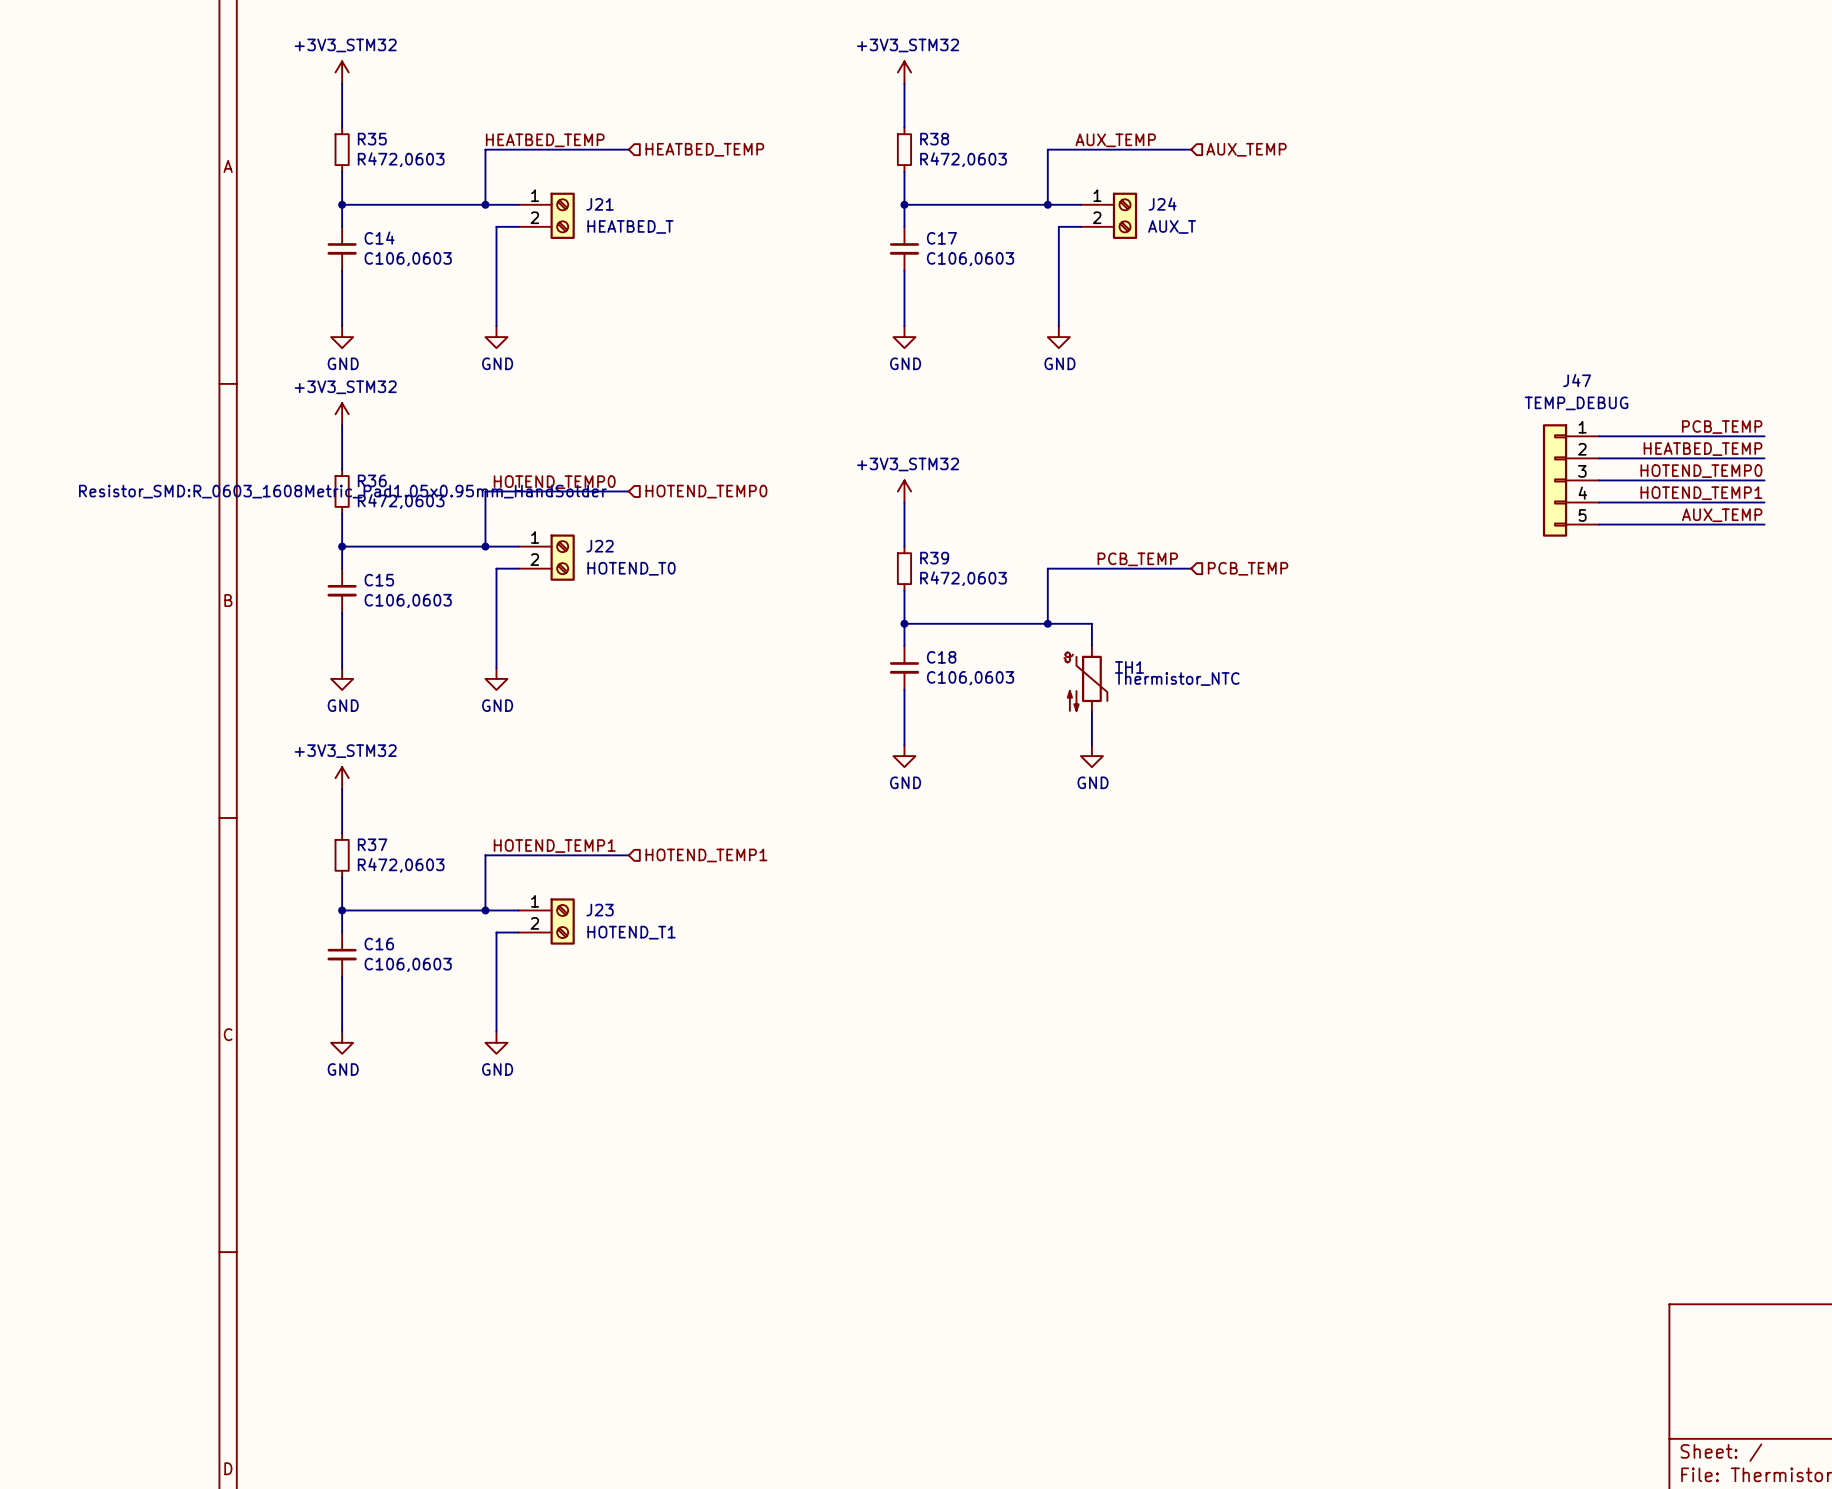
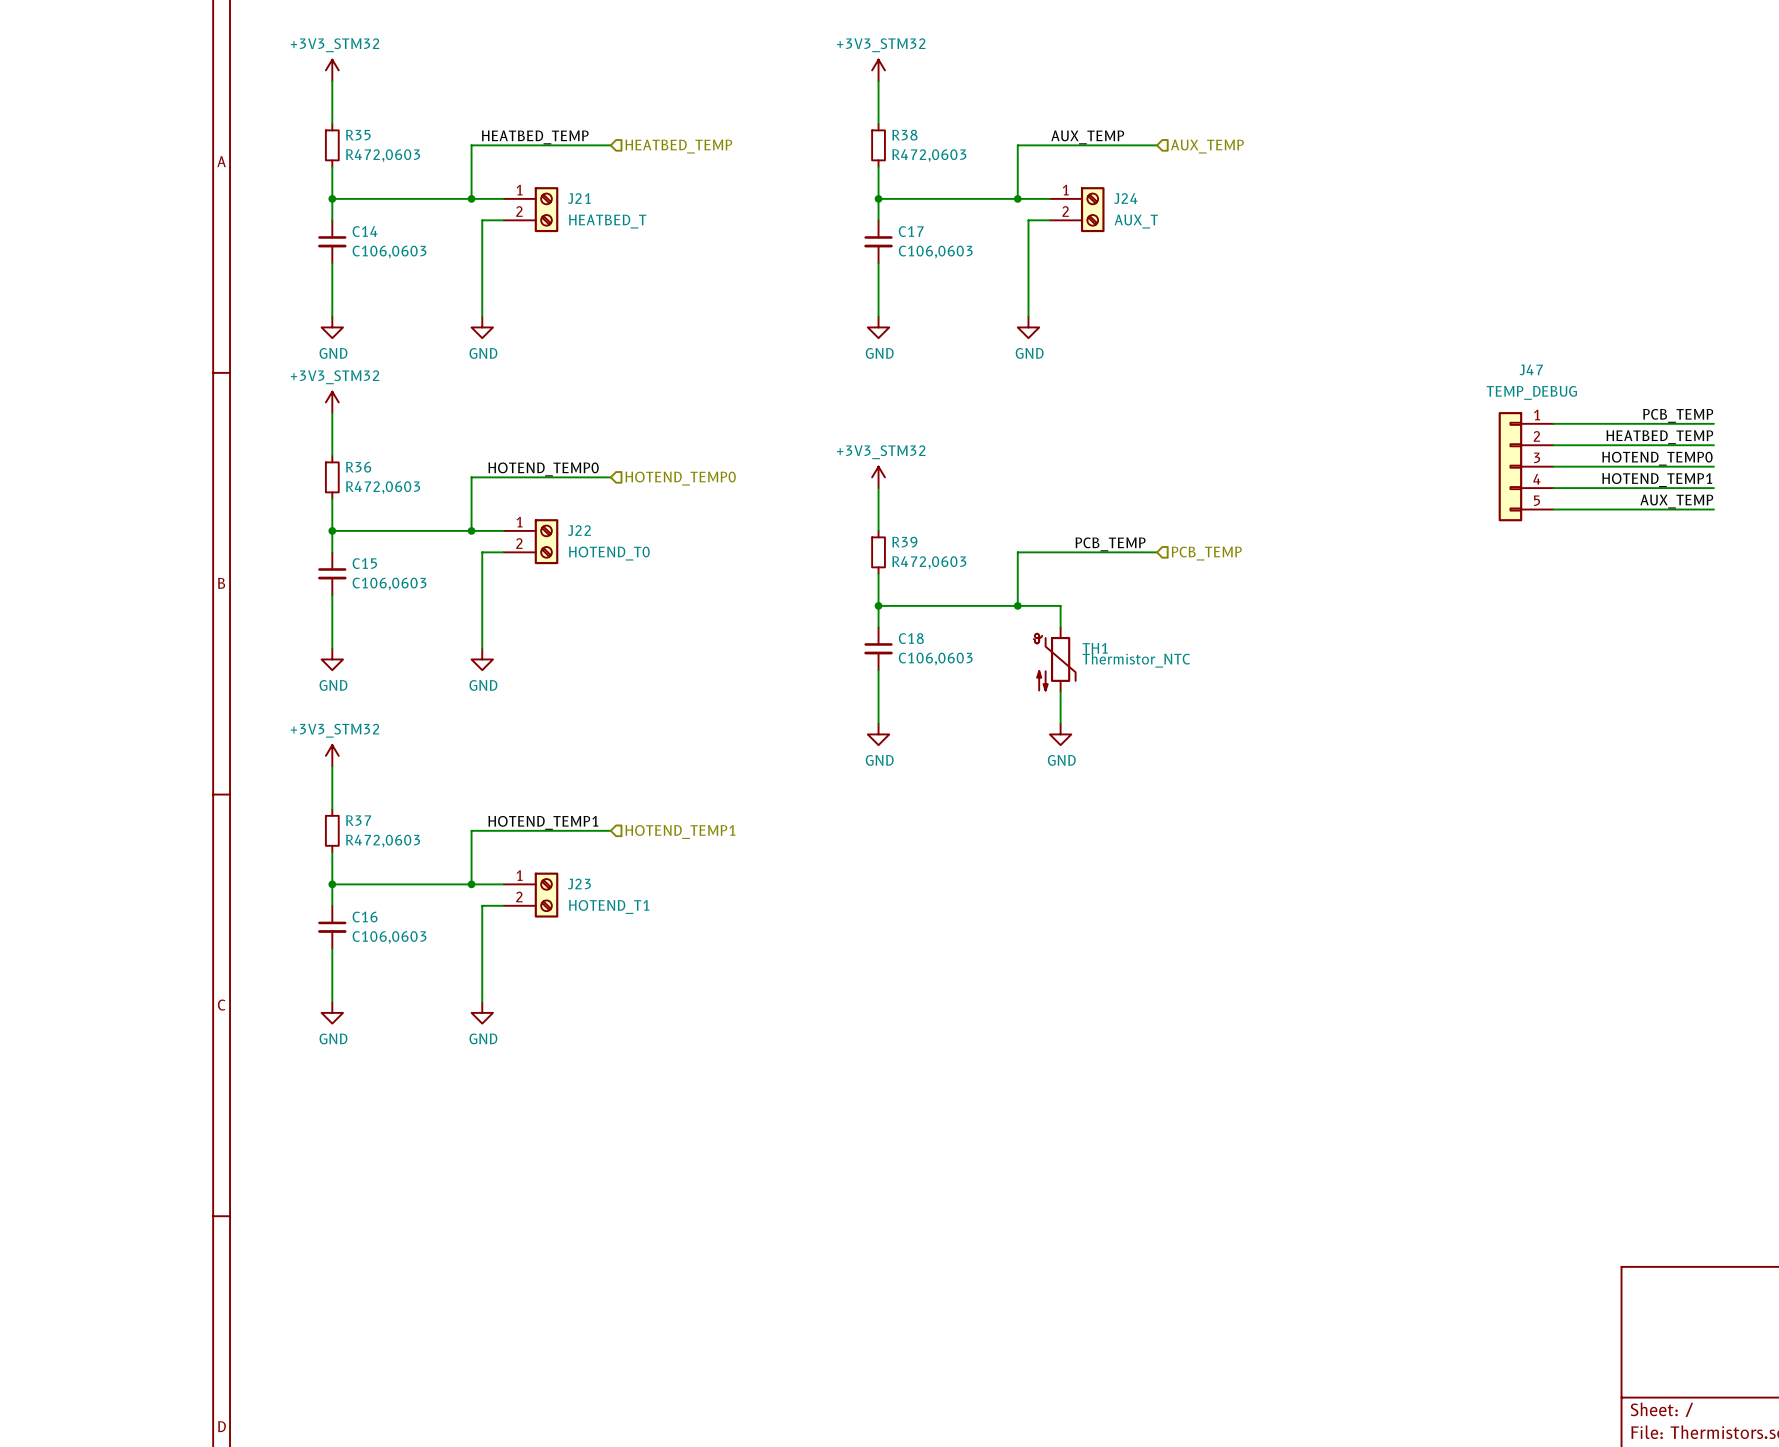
R36 text: Resistor_SMD:R_0603_1608Metric_Pad1.05x0.95mm_HandSolder (342, 491) -> none

